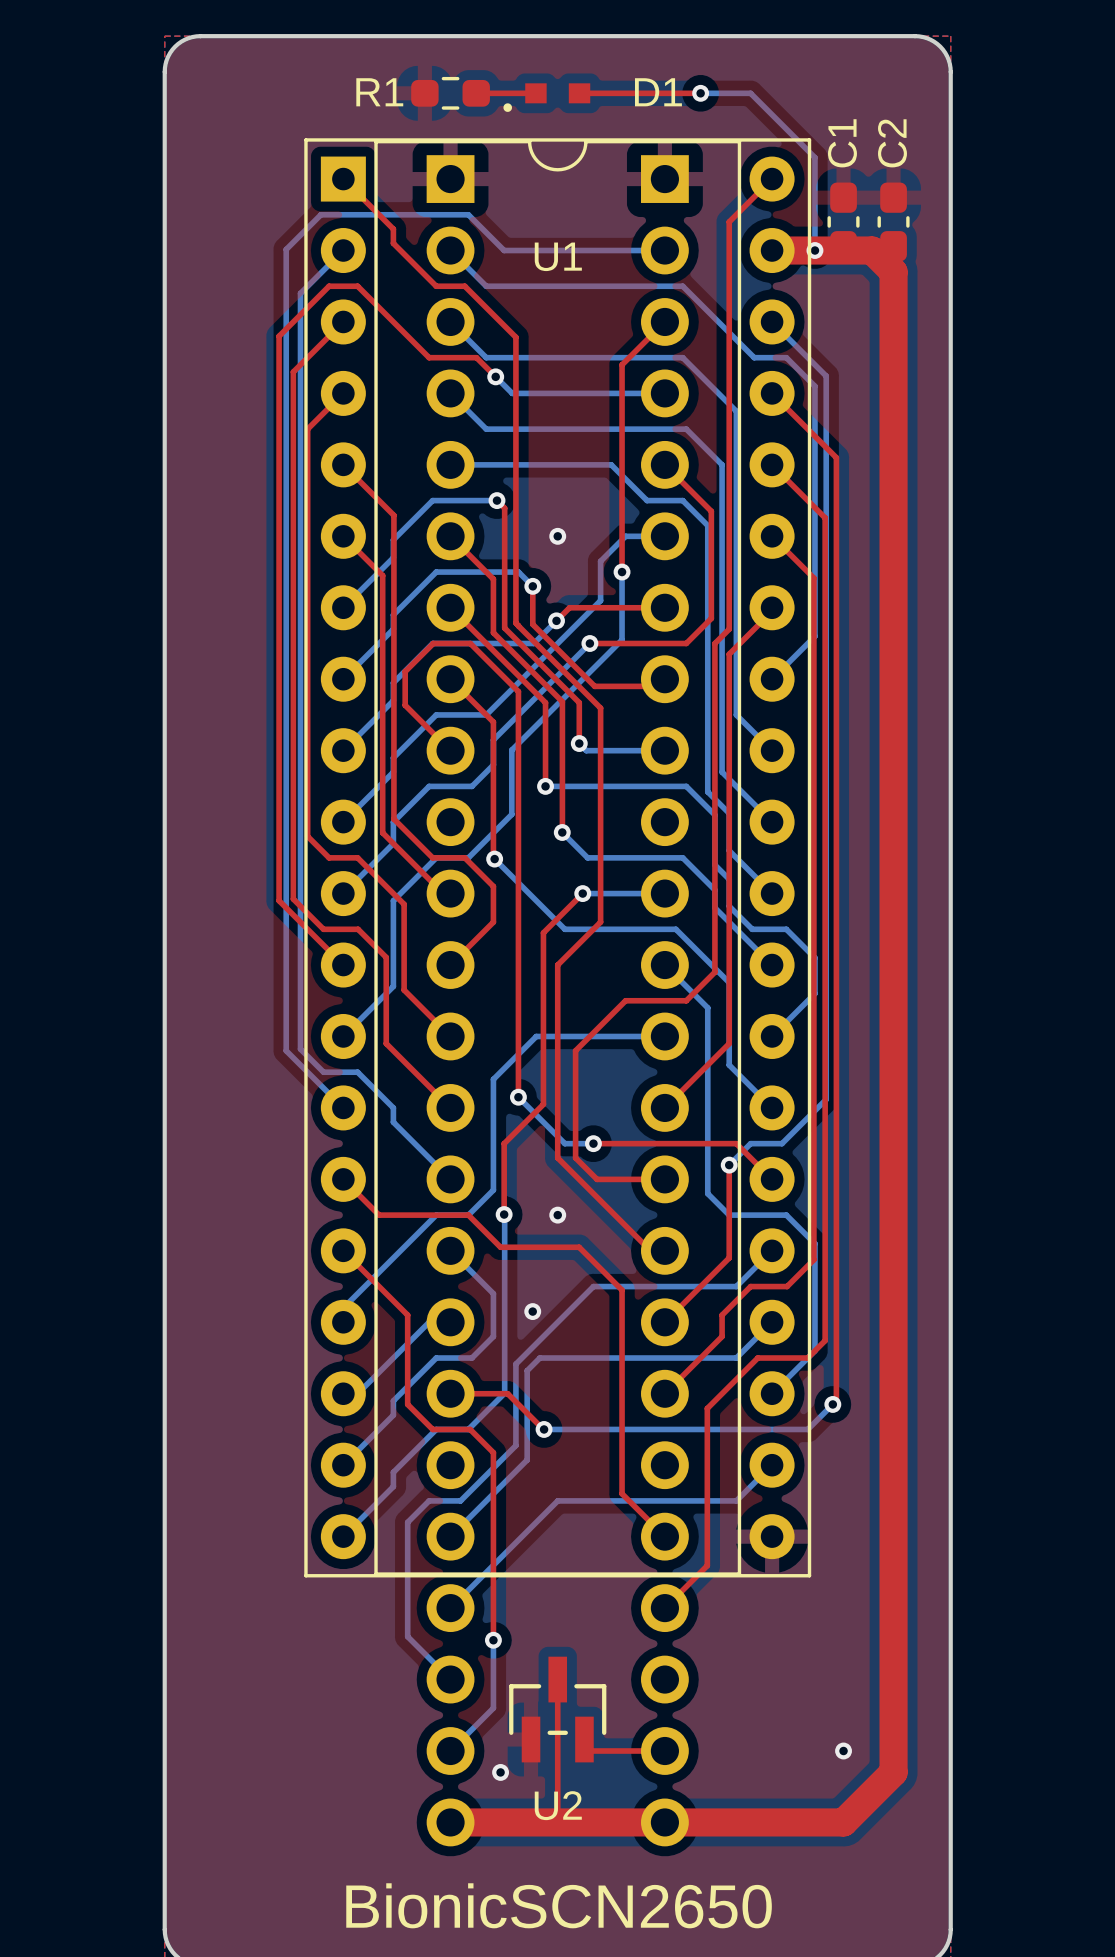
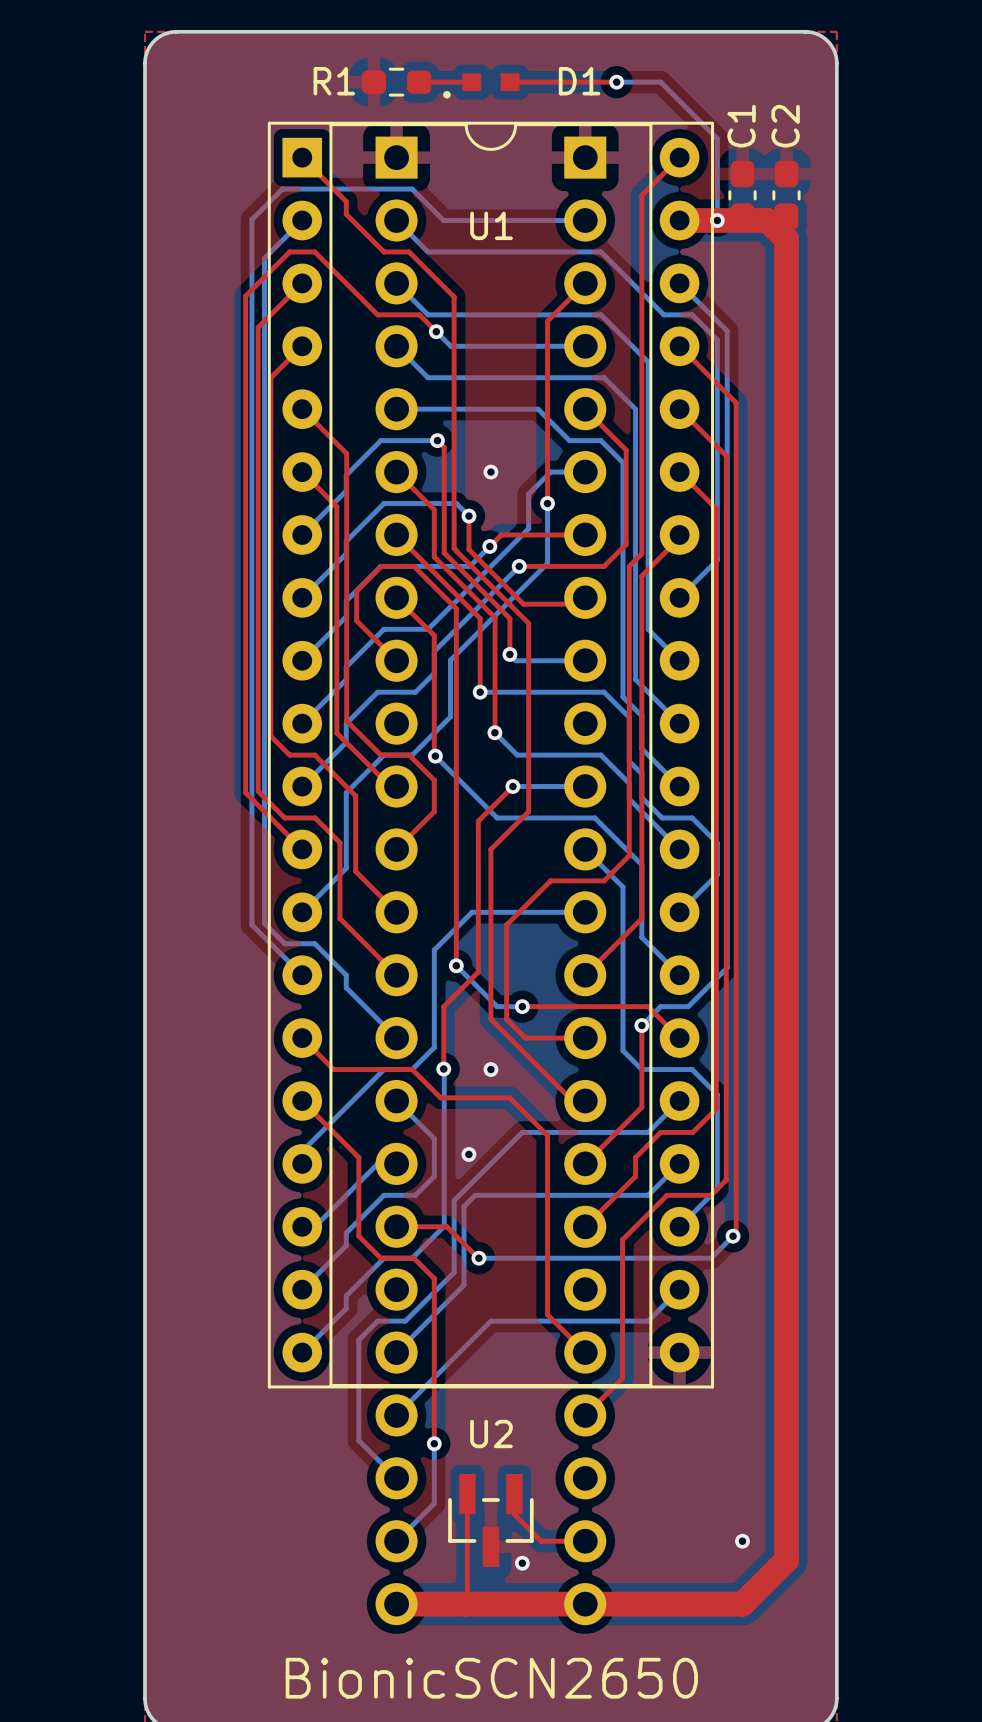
top track: (557, 1686) (557, 1822) -> none
top track: none -> (467, 1494) (467, 1602) (465, 1604)
U2 rotation: 0° (557, 1709) -> 180° (490, 1520)
top track: (584, 1743) (591, 1751) (614, 1751) -> (514, 1494) (514, 1514) (541, 1541)
via position: (500, 1772) -> (522, 1563)

